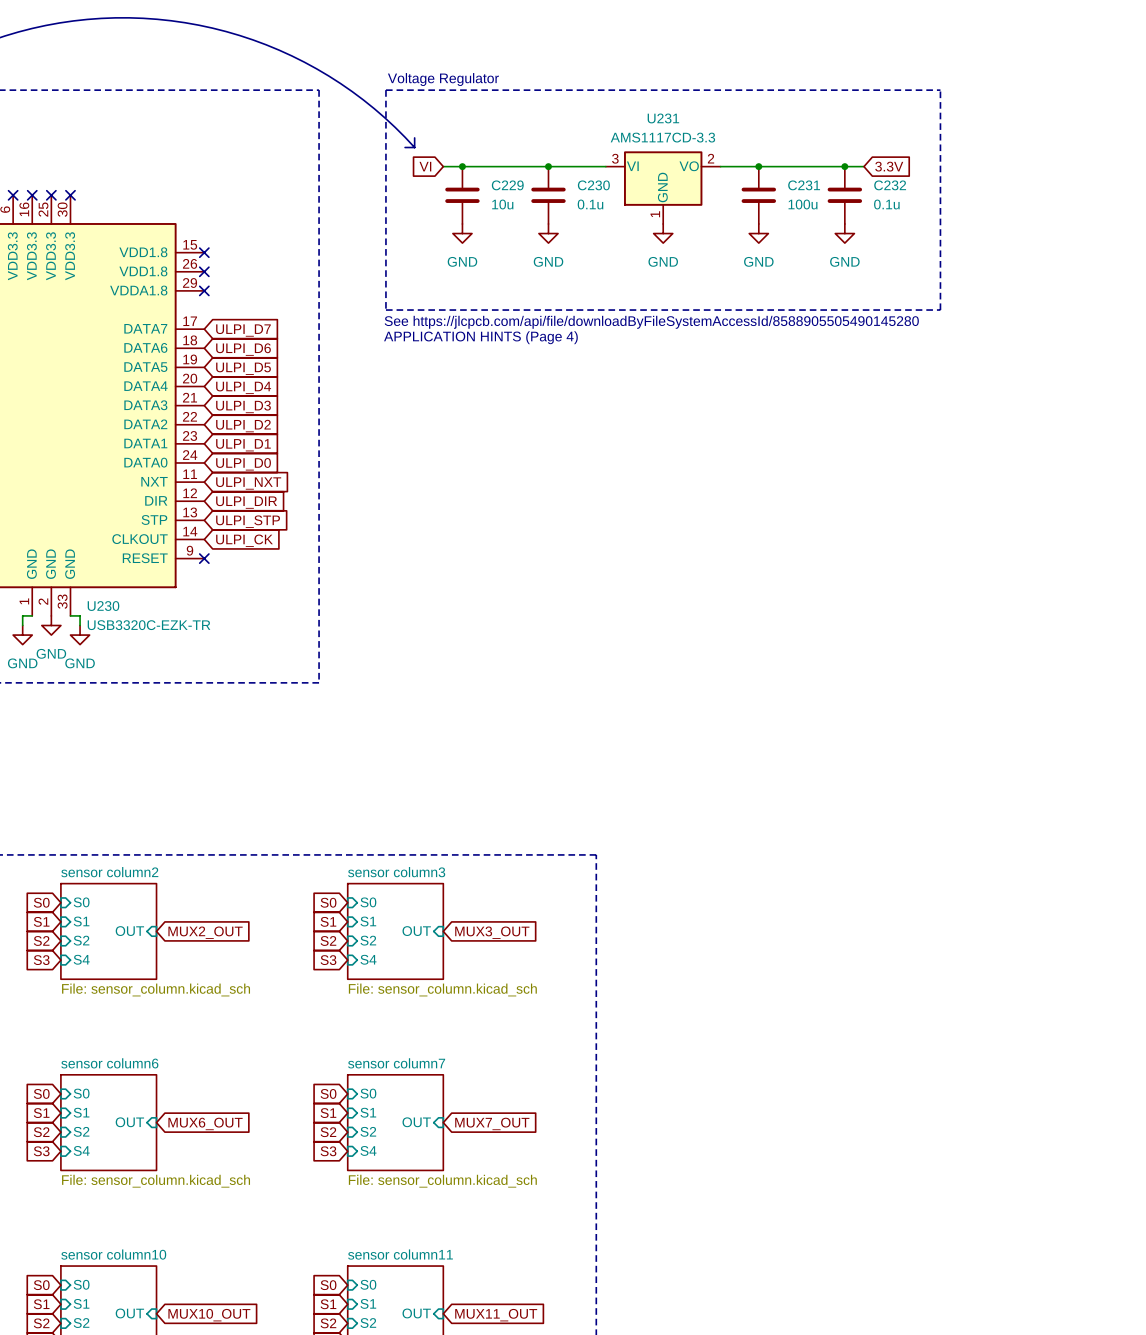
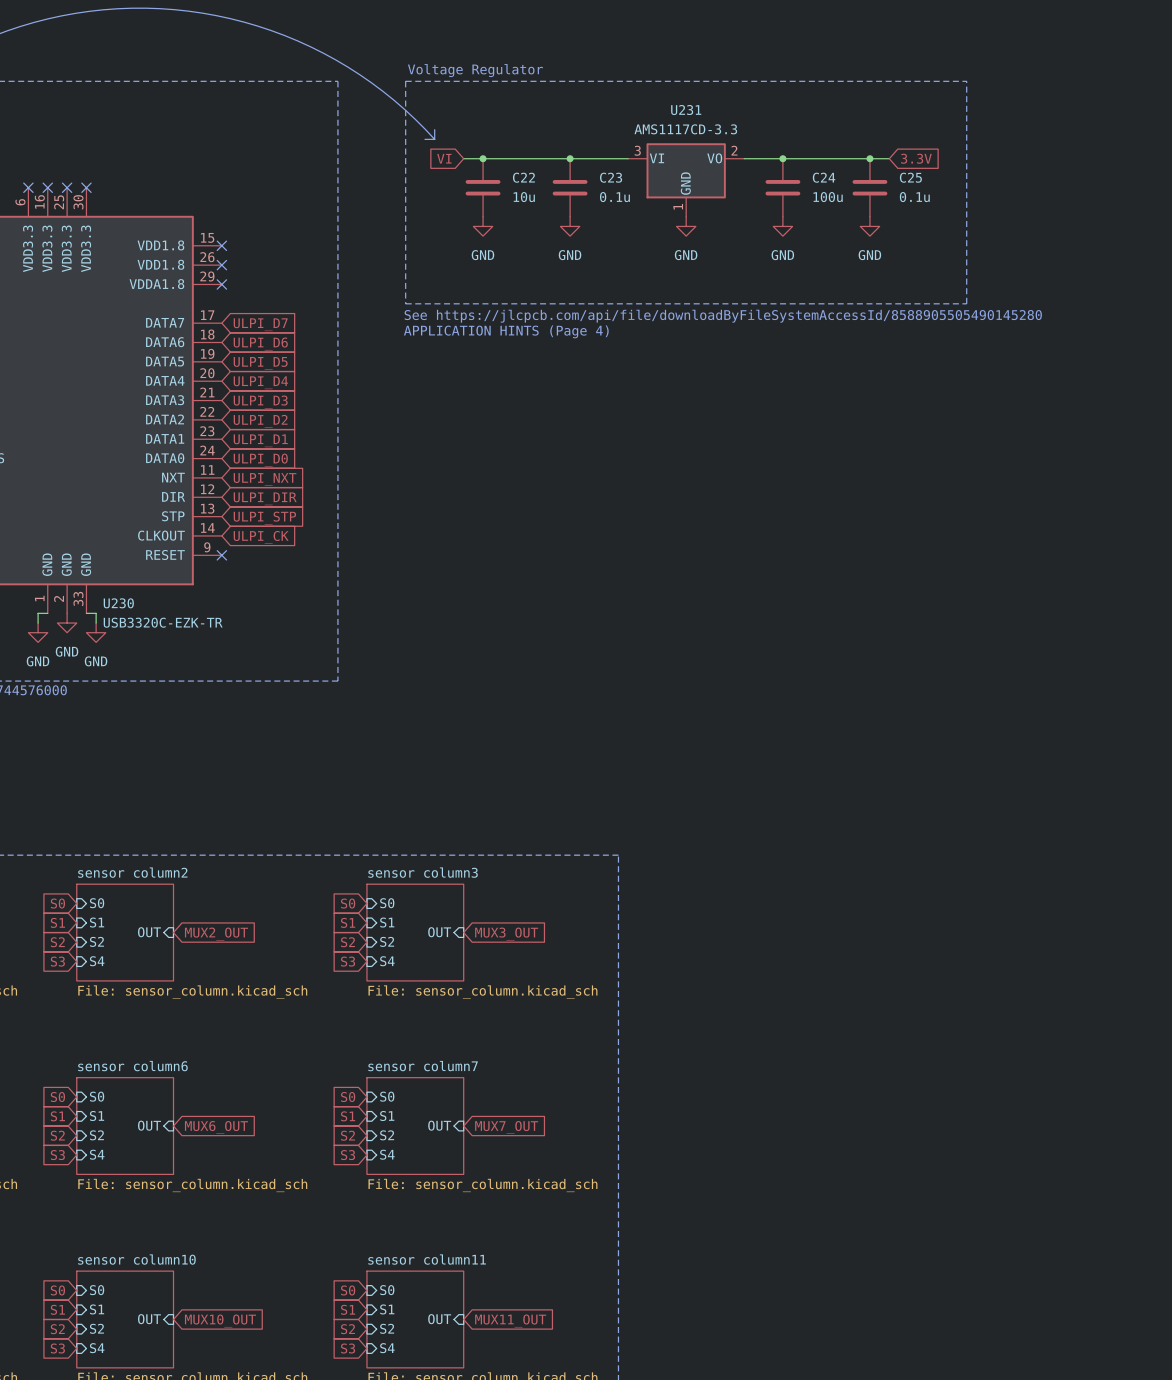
C229 name: C229 (507, 185) -> C22 (523, 177)
C230 name: C230 (593, 185) -> C23 (611, 177)
C231 name: C231 (804, 185) -> C24 (824, 177)
C232 name: C232 (890, 185) -> C25 (910, 177)

